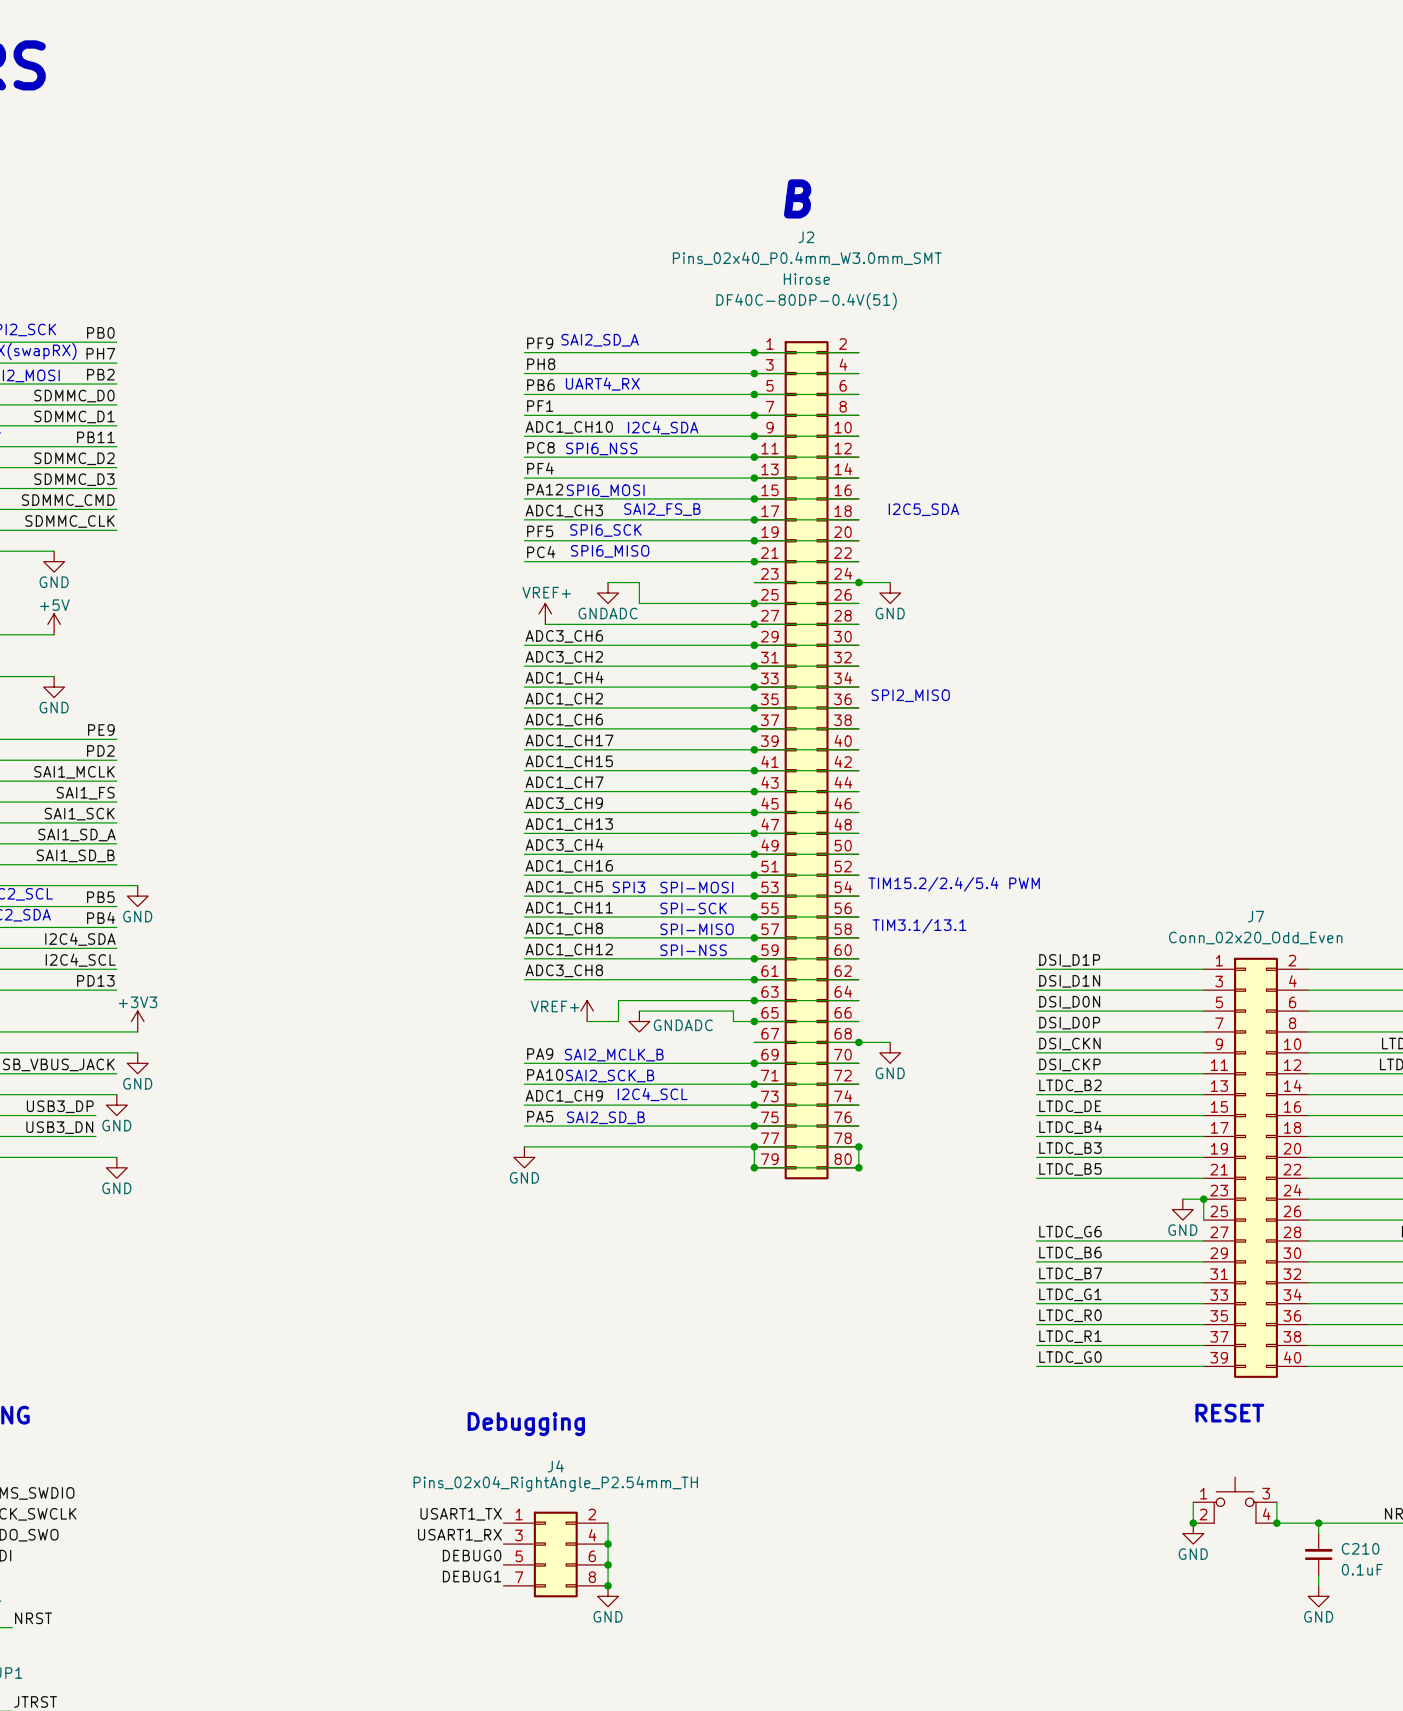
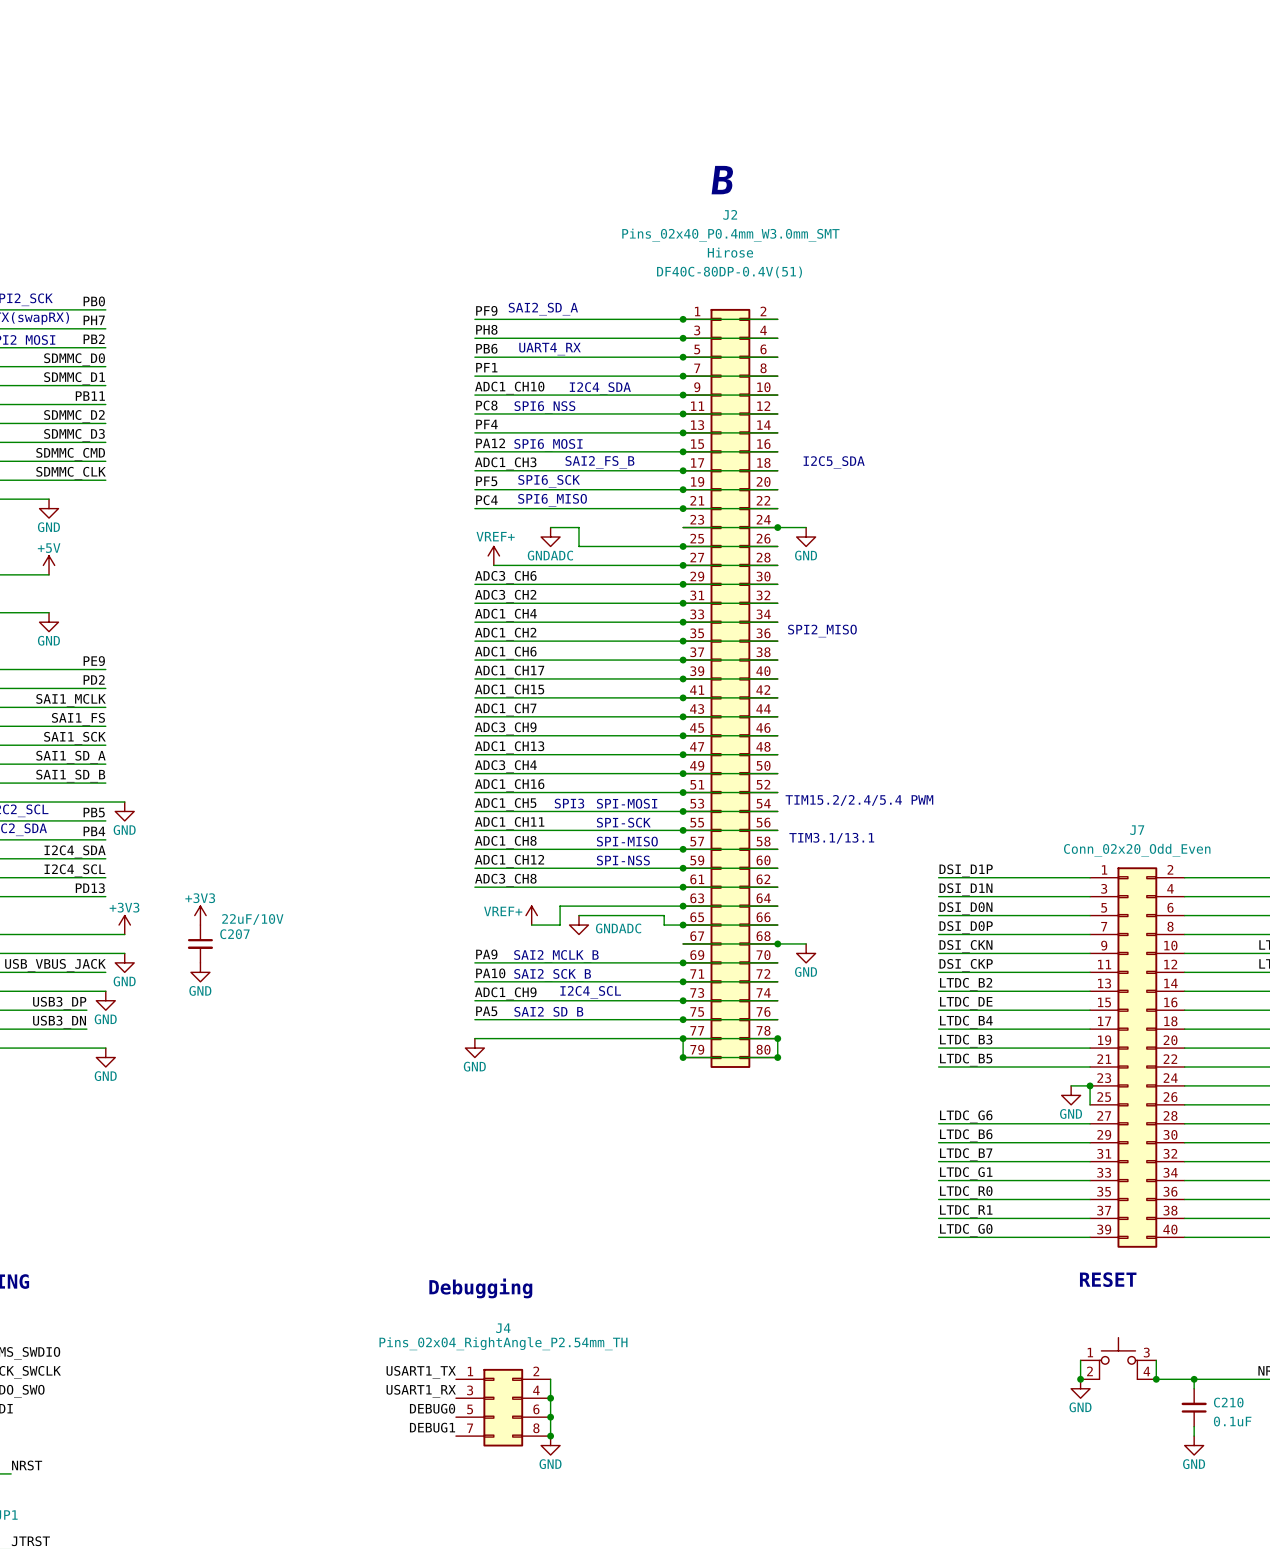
power symbol: none -> +3V3 (200, 915)
C207: none -> (200, 943)
power symbol: none -> GND (200, 972)

